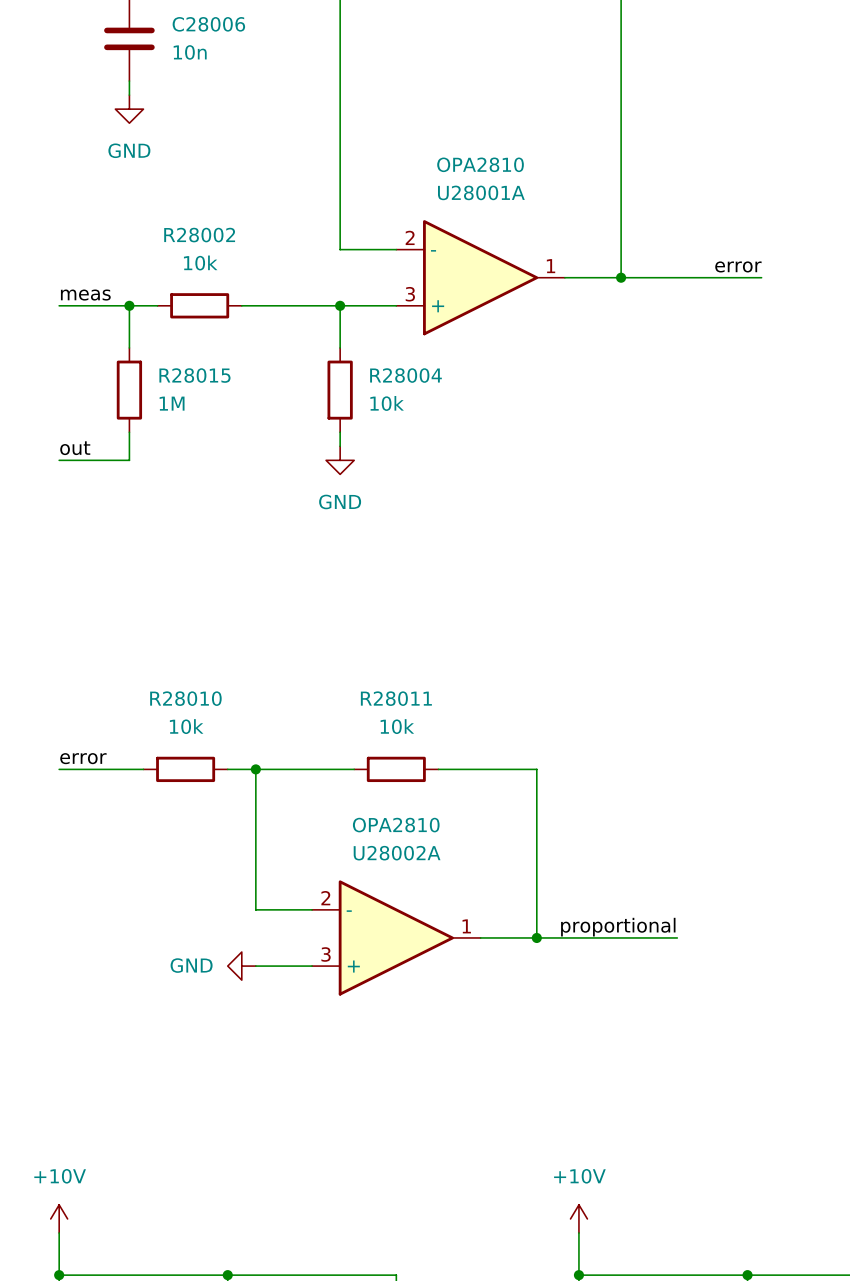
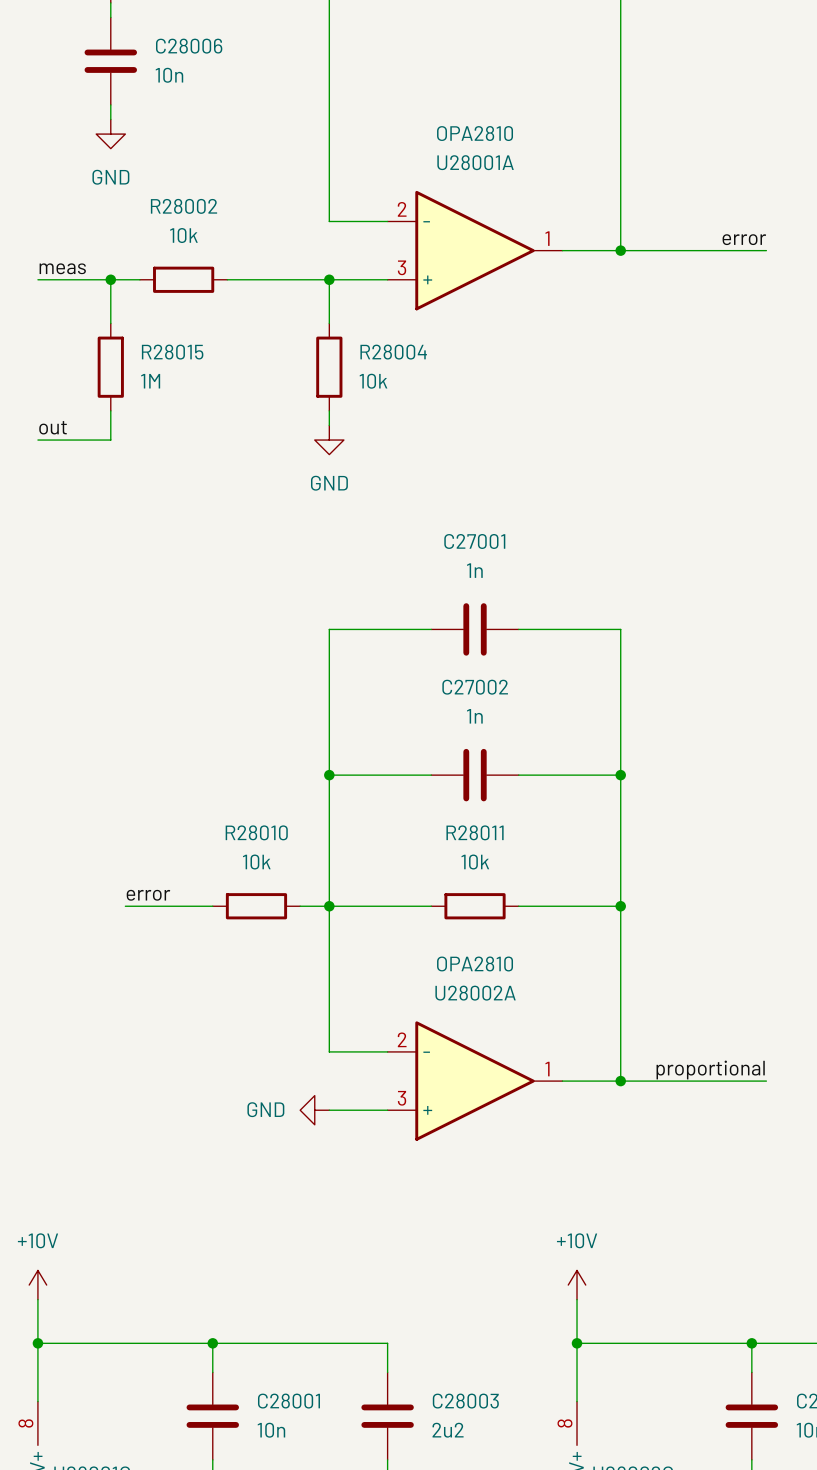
wire: (340, 193) (340, 249) -> (329, 221) (387, 221)
wire: (621, 221) (621, 277) -> none
wire: none -> (227, 279) (329, 279) (329, 323)
label position: error (738, 266) -> error (744, 239)
U28001A position: (480, 277) -> (475, 250)
wire: (564, 277) (761, 277) -> (562, 250) (766, 250)
junction position: (621, 277) -> (620, 250)
label position: meas (85, 295) -> meas (62, 268)
wire: (59, 305) (157, 305) -> (37, 279) (139, 279)
wire: (129, 305) (129, 347) -> (110, 279) (110, 323)
junction position: (129, 305) -> (110, 279)
R28002 position: (199, 305) -> (183, 279)
wire: (241, 305) (396, 305) -> none
wire: (340, 305) (340, 347) -> none
junction position: (340, 305) -> (329, 279)
R28015 position: (129, 390) -> (110, 367)
R28004 position: (340, 390) -> (329, 367)
wire: (129, 432) (129, 460) (59, 460) -> (110, 410) (110, 440) (37, 440)
wire: (340, 432) (340, 446) -> (329, 410) (329, 425)
label position: out (75, 448) -> out (53, 427)
power symbol position: GND (340, 460) -> GND (329, 440)
wire: none -> (431, 629) (329, 629) (329, 1051) (387, 1051)
C27001: none -> 1n (475, 629)
wire: none -> (518, 629) (620, 629) (620, 1081)
wire: none -> (329, 775) (431, 775)
junction: none -> (329, 775)
C27002: none -> 1n (475, 775)
wire: none -> (518, 775) (620, 775)
junction: none -> (620, 775)
label position: error (83, 758) -> error (148, 895)
wire: (59, 769) (143, 769) -> (125, 906) (212, 906)
R28010 position: (185, 769) -> (256, 906)
wire: (227, 769) (354, 769) -> (300, 906) (431, 906)
wire: (255, 769) (255, 909) (312, 909) -> none
junction: (255, 769) -> none
R28011 position: (396, 769) -> (475, 906)
wire: (438, 769) (536, 769) (536, 937) -> none
junction: none -> (329, 906)
wire: none -> (518, 906) (620, 906)
junction: none -> (620, 906)
label position: proportional (618, 927) -> proportional (710, 1070)
U28002A position: (396, 937) -> (475, 1081)
wire: (480, 937) (677, 937) -> (562, 1081) (766, 1081)
junction: (536, 937) -> none
power symbol position: GND (241, 966) -> GND (314, 1110)
wire: (255, 966) (312, 966) -> (329, 1110) (387, 1110)
junction: none -> (620, 1081)

